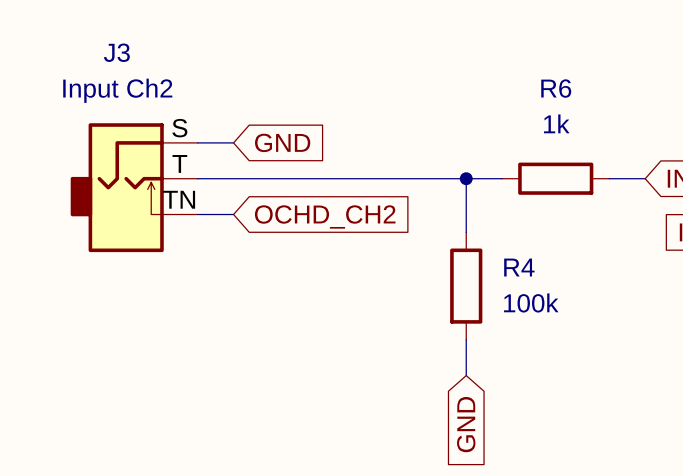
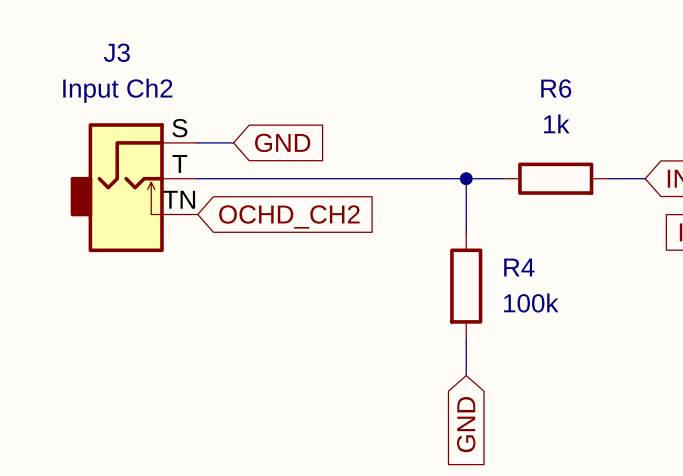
wire: (197, 214) (233, 214) -> none
global label position: OCHD_CH2 (325, 216) -> OCHD_CH2 (289, 216)

